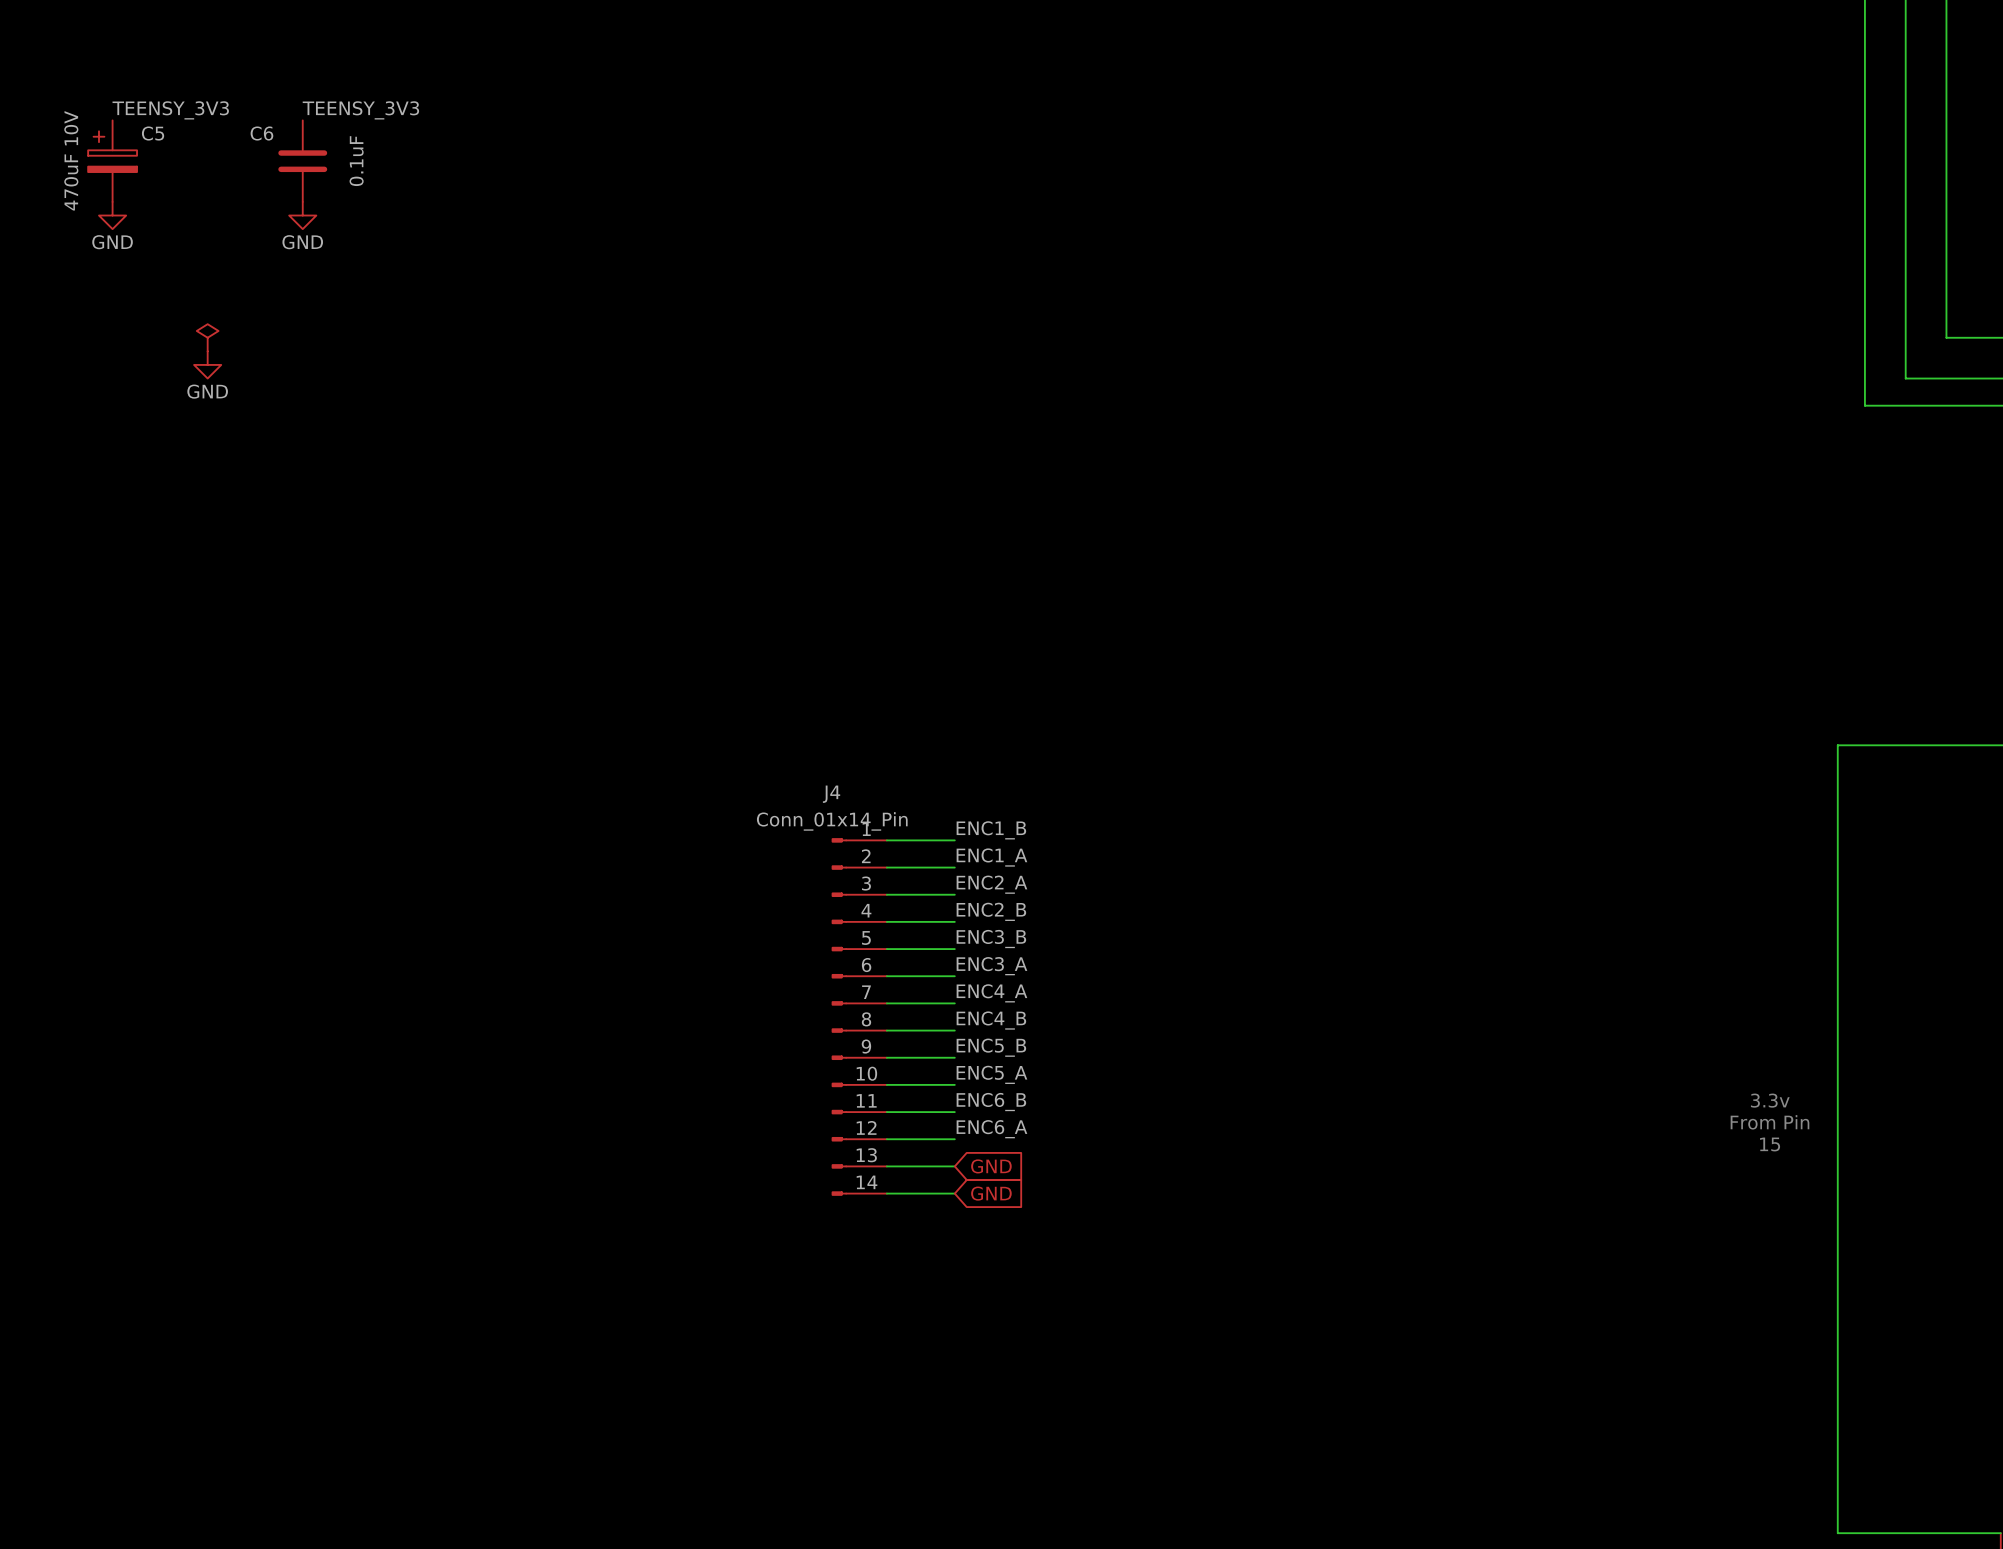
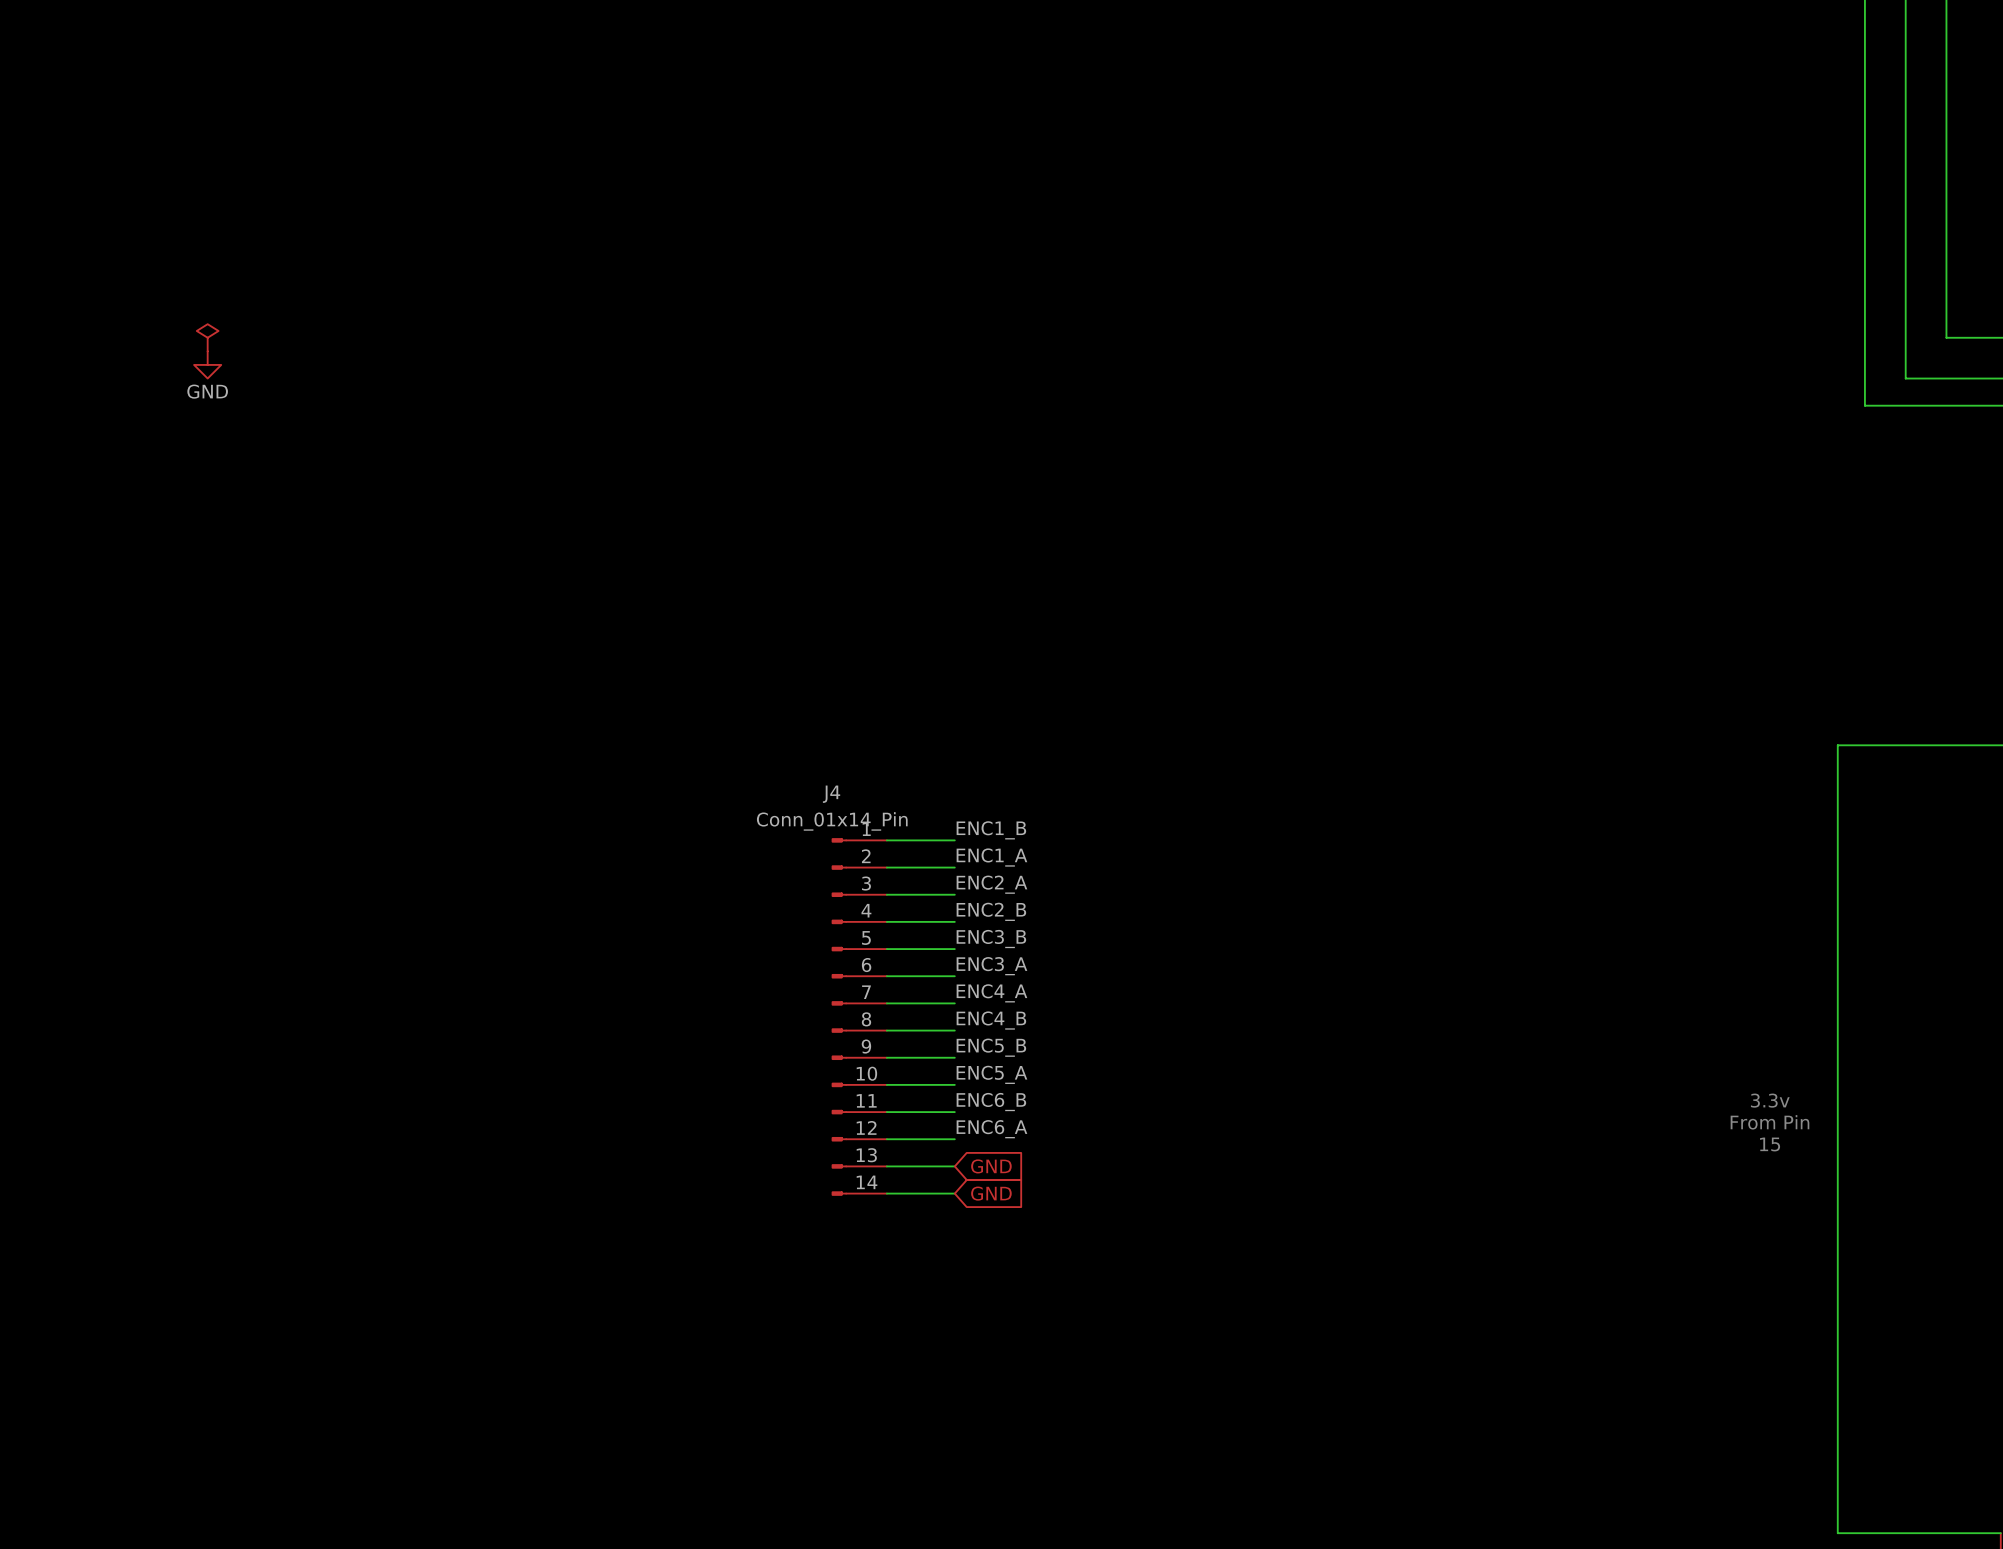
label: TEENSY_3V3 (170, 110) -> none
label: TEENSY_3V3 (360, 110) -> none
C5: 470uF 10V (112, 161) -> none
C6: 0.1uF (302, 161) -> none
power symbol: GND (112, 215) -> none
power symbol: GND (302, 215) -> none

